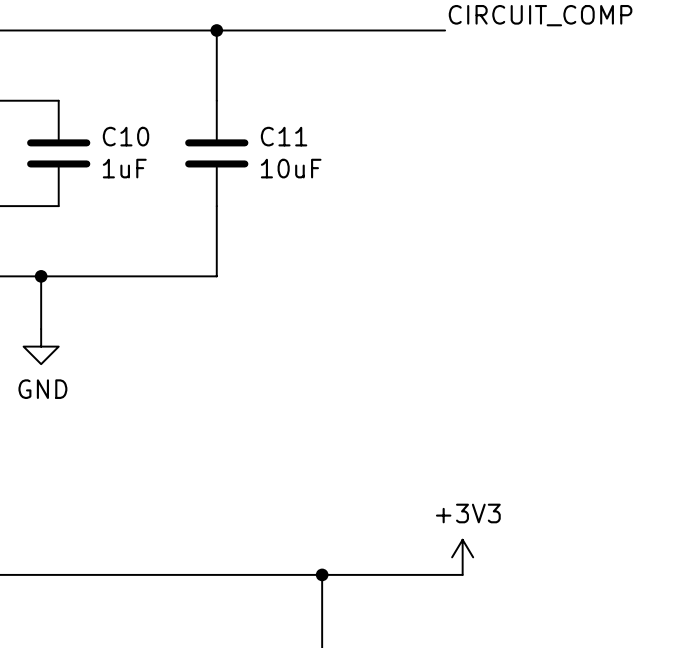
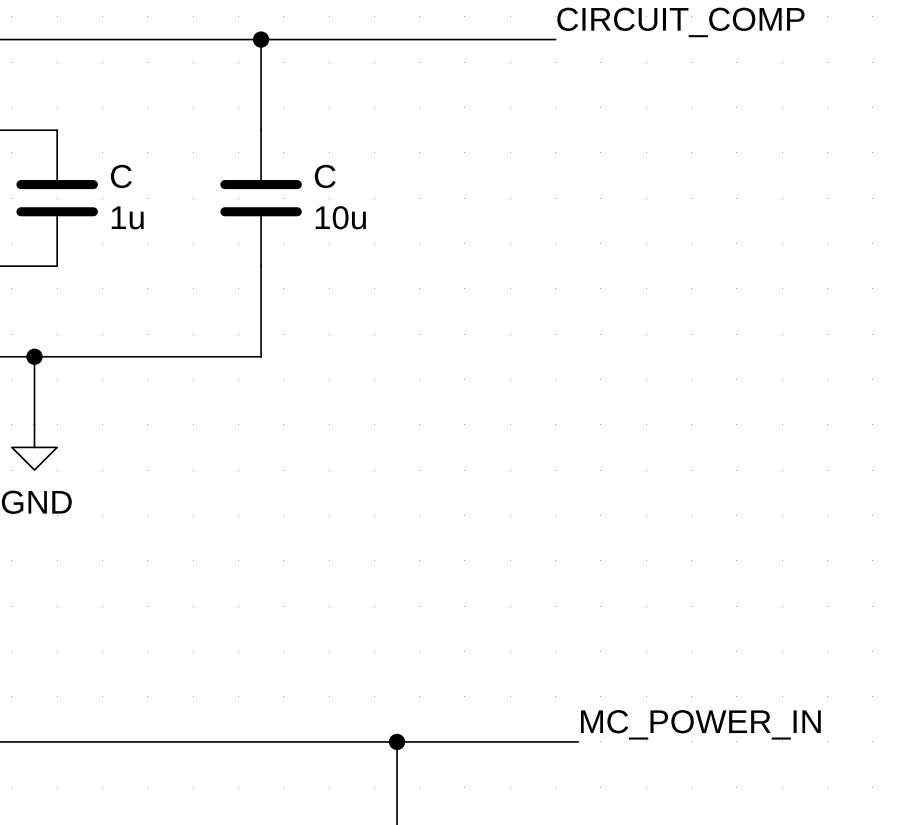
C10 name: C10 (126, 136) -> C (121, 176)
C11 name: C11 (284, 136) -> C (325, 176)
C10 value: 1uF (124, 168) -> 1u (127, 217)
C11 value: 10uF (291, 168) -> 10u (340, 217)
power symbol: +3V3 (462, 557) -> none
label: none -> MC_POWER_IN (700, 724)

